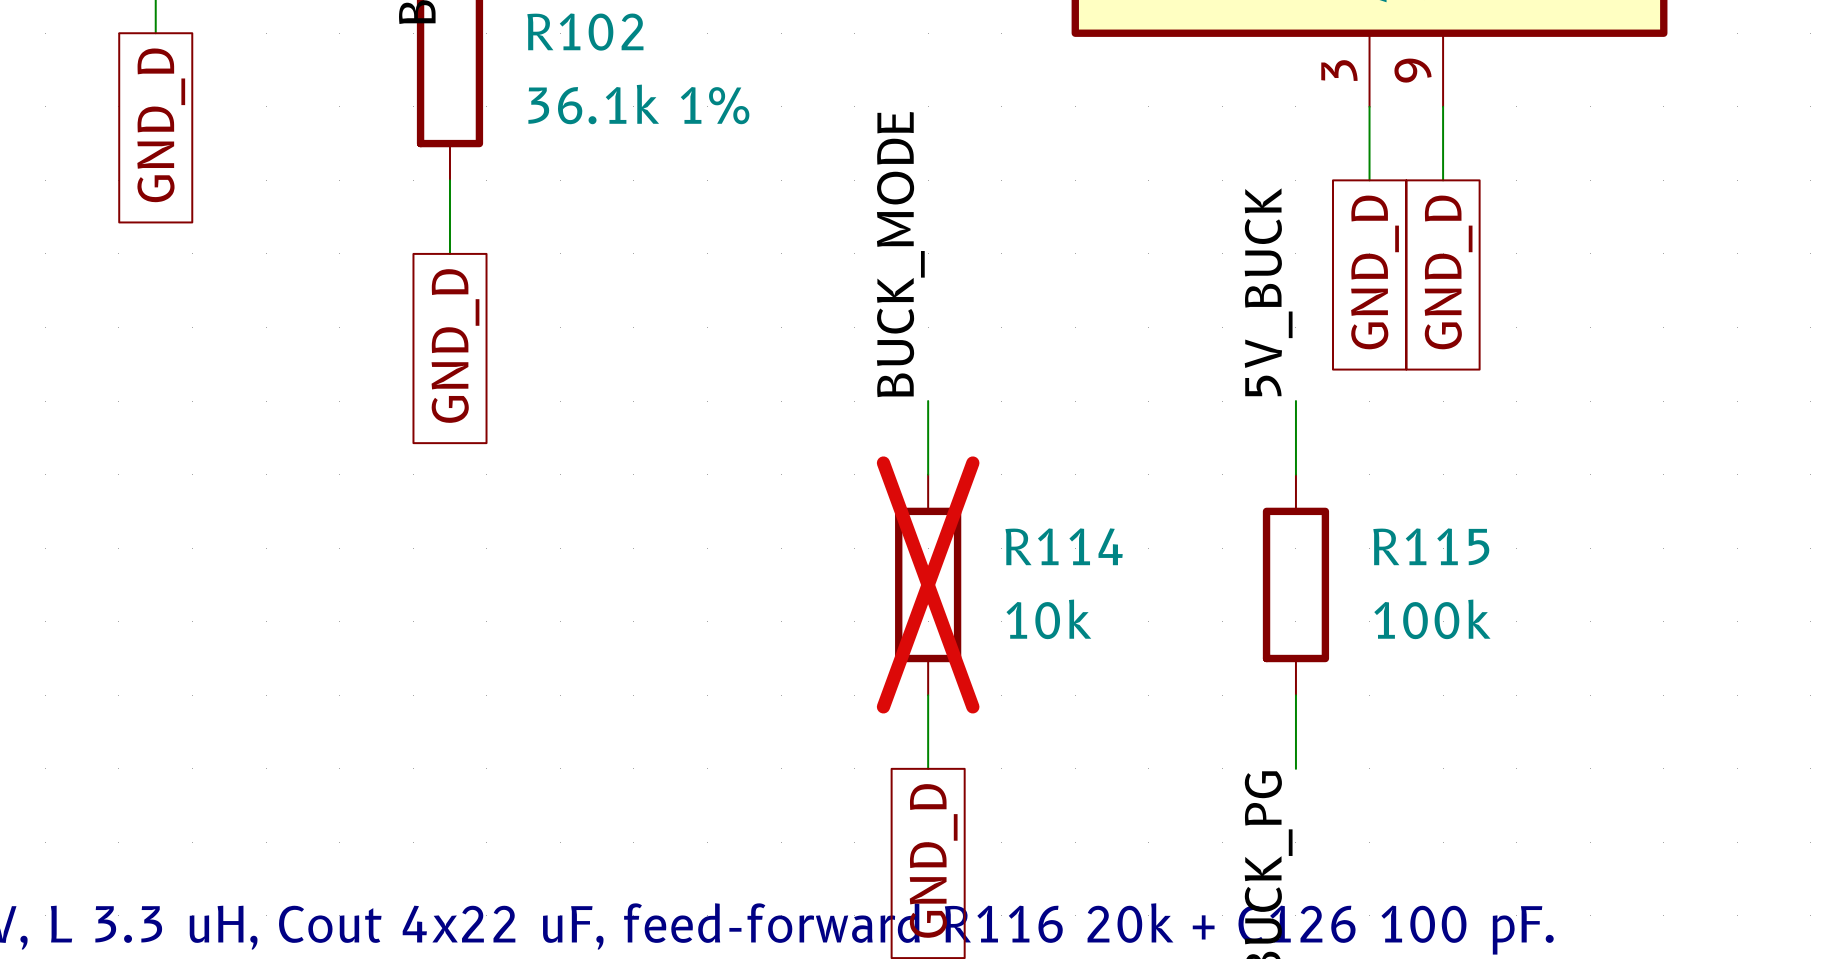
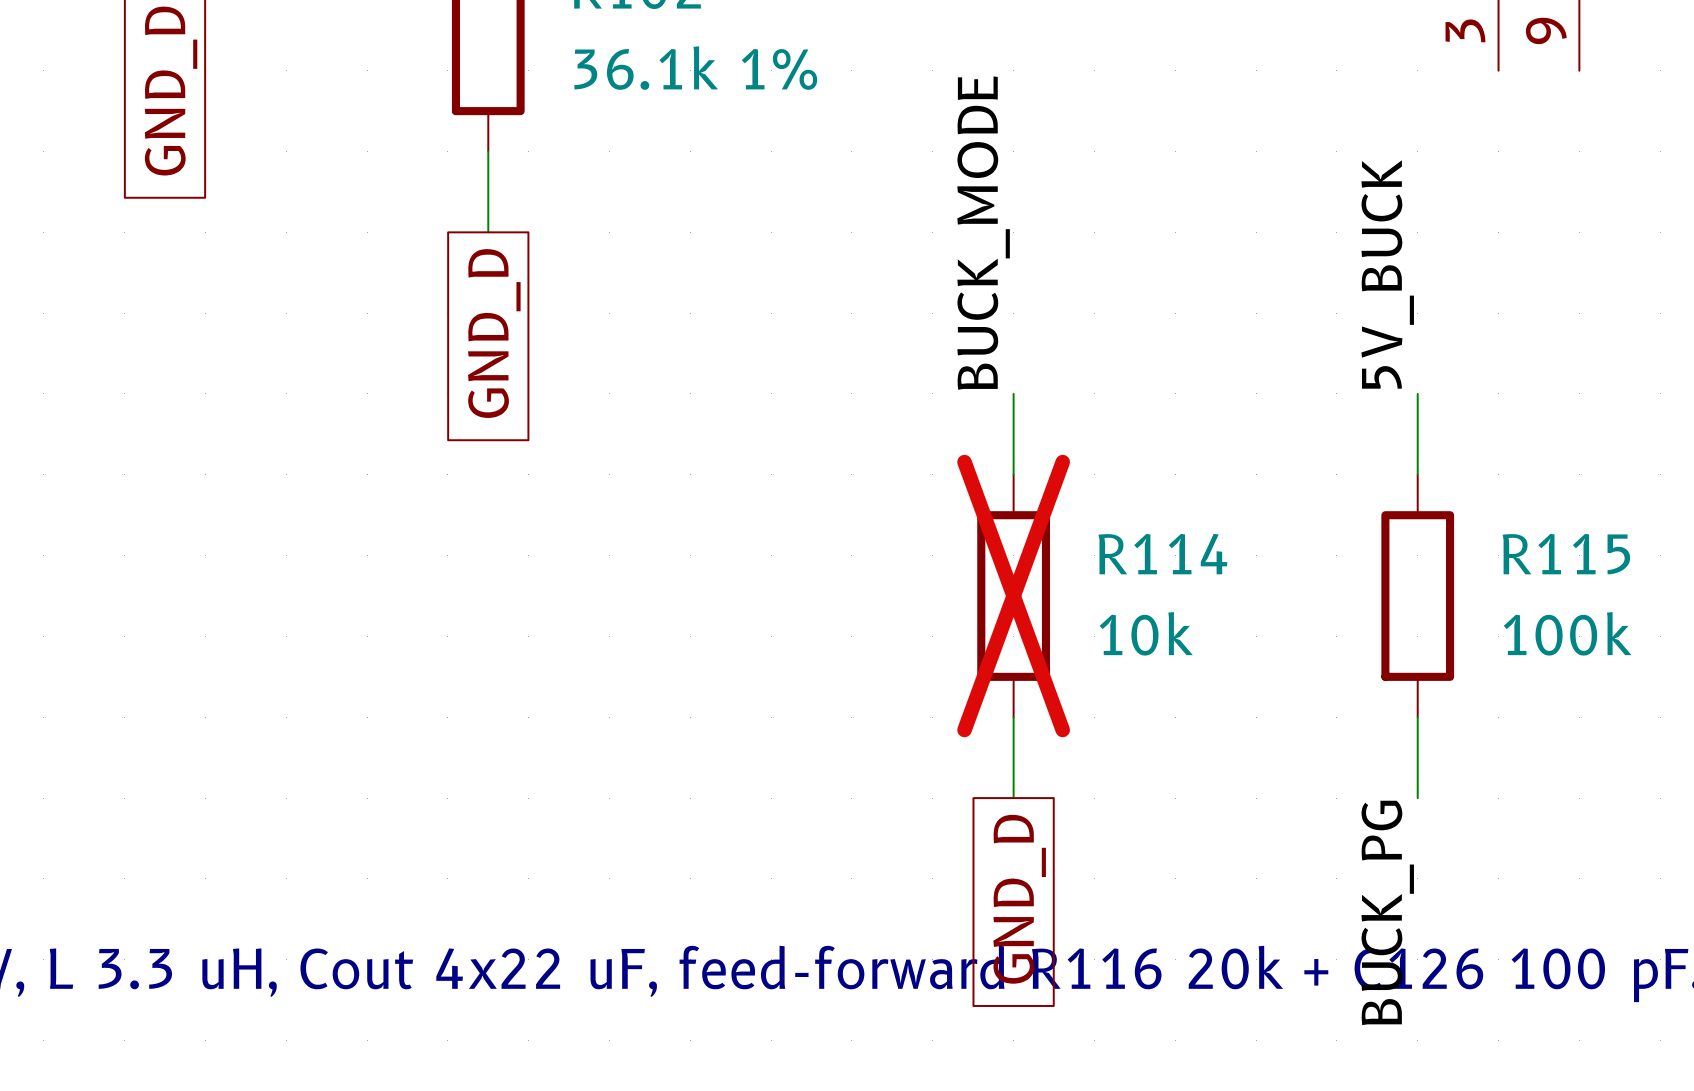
wire: (1369, 106) (1369, 180) -> none
wire: (1443, 106) (1443, 180) -> none
global label: GND_D (1375, 272) -> none
global label: GND_D (1448, 272) -> none

